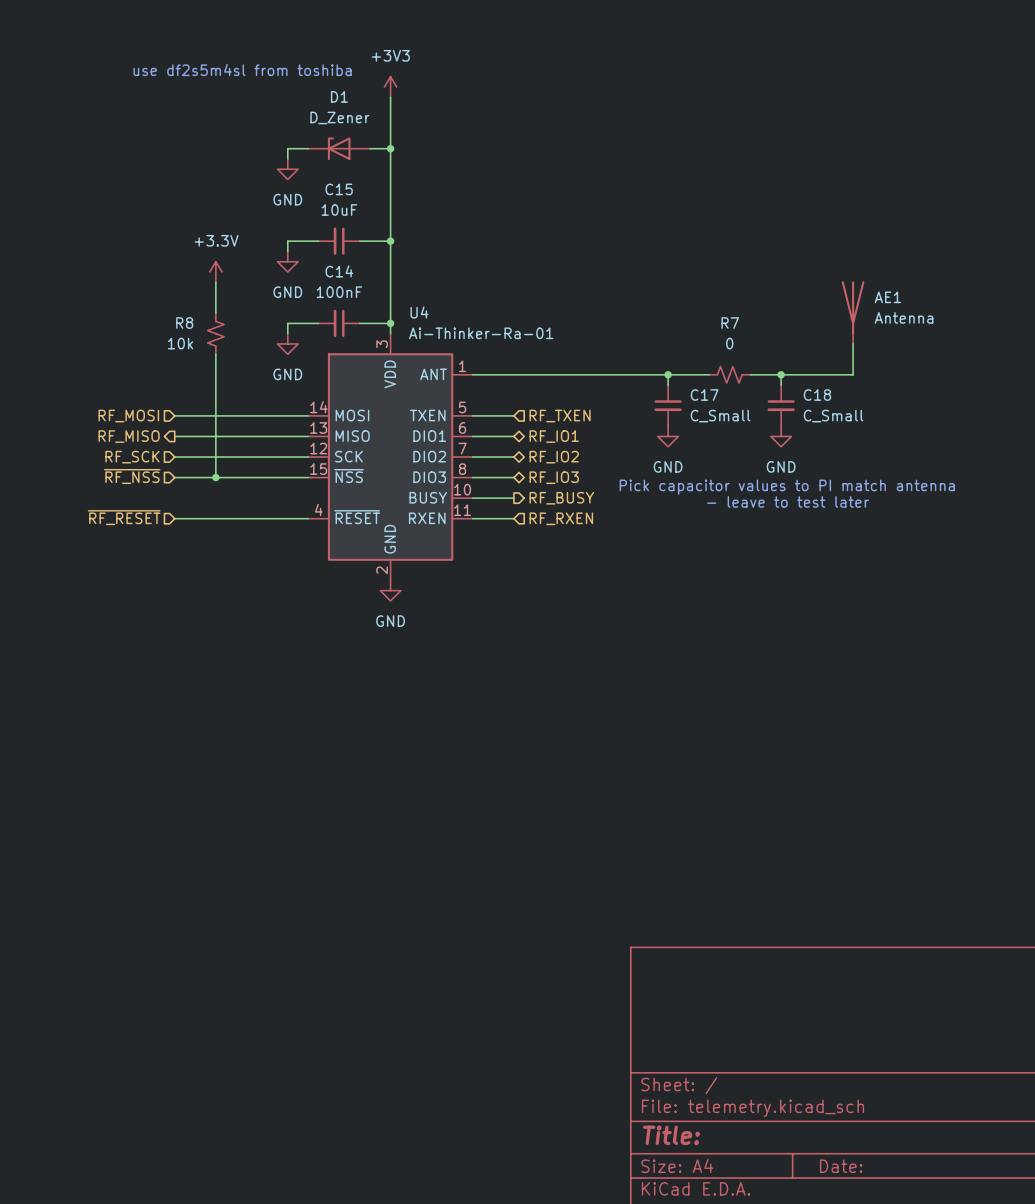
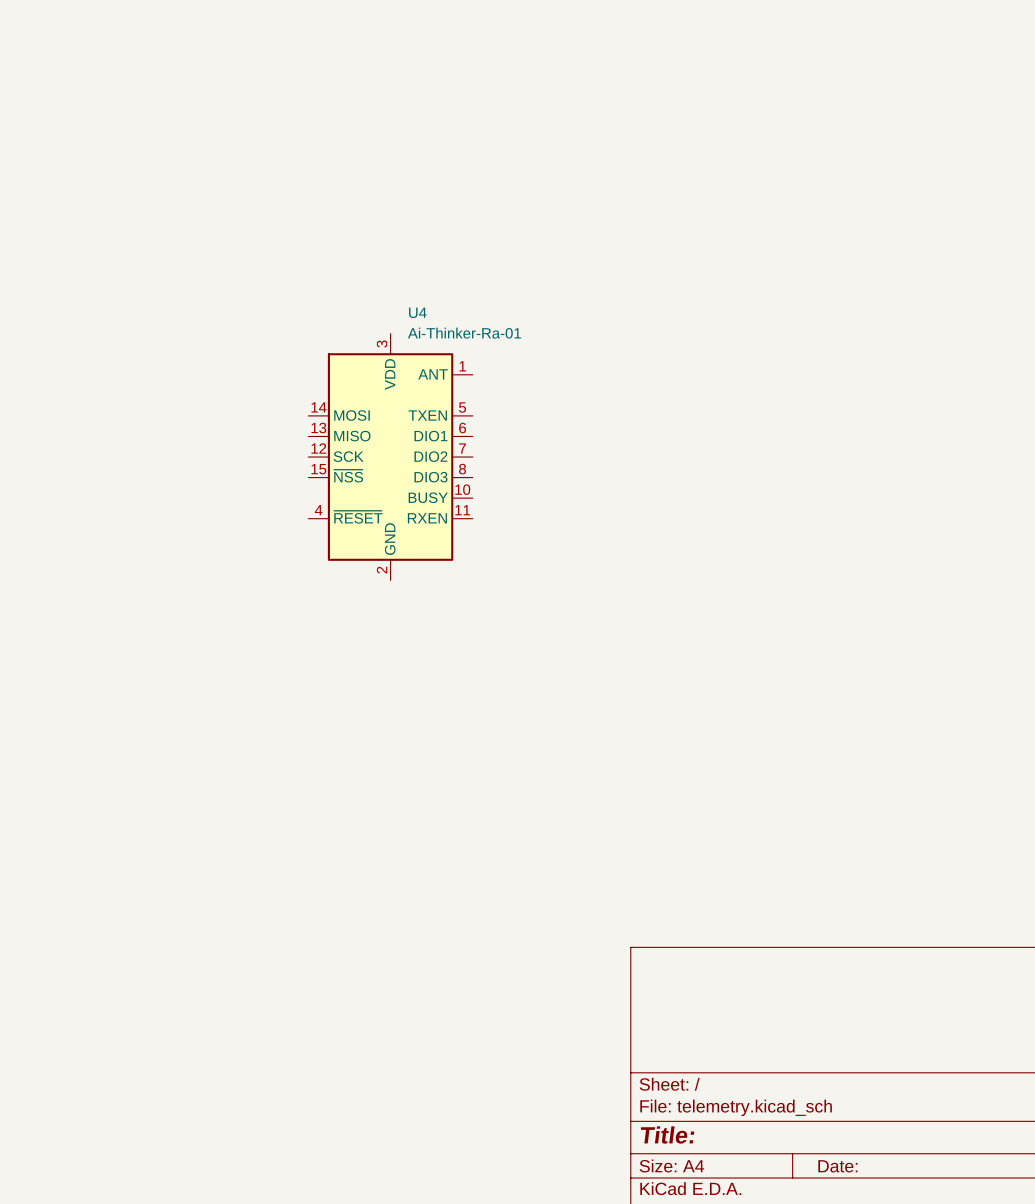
text: use df2s5m4sl from toshiba (242, 69) -> none
power symbol: +3V3 (390, 87) -> none
wire: (390, 97) (390, 333) -> none
wire: (308, 148) (287, 148) (287, 158) -> none
D1: D_Zener (339, 148) -> none
wire: (370, 148) (390, 148) -> none
junction: (390, 148) -> none
power symbol: GND (287, 169) -> none
wire: (318, 241) (287, 241) (287, 251) -> none
C15: 10uF (339, 241) -> none
wire: (359, 241) (390, 241) -> none
junction: (390, 241) -> none
power symbol: GND (287, 261) -> none
power symbol: +3.3V (215, 272) -> none
wire: (215, 282) (215, 313) -> none
AE1: Antenna (853, 312) -> none
wire: (318, 323) (287, 323) (287, 333) -> none
C14: 100nF (339, 323) -> none
wire: (359, 323) (390, 323) -> none
junction: (390, 323) -> none
R8: 10k (215, 333) -> none
power symbol: GND (287, 343) -> none
wire: (853, 343) (853, 374) (750, 374) -> none
wire: (215, 354) (215, 477) -> none
wire: (472, 374) (709, 374) -> none
wire: (668, 374) (668, 385) -> none
junction: (668, 374) -> none
R7: 0 (729, 374) -> none
wire: (781, 374) (781, 385) -> none
junction: (781, 374) -> none
C17: C_Small (668, 405) -> none
C18: C_Small (781, 405) -> none
wire: (174, 415) (308, 415) -> none
wire: (472, 415) (513, 415) -> none
hierarchical label: RF_MOSI (128, 416) -> none
hierarchical label: RF_TXEN (560, 416) -> none
hierarchical label: RF_MISO (129, 436) -> none
wire: (174, 436) (308, 436) -> none
wire: (472, 436) (513, 436) -> none
hierarchical label: RF_IO1 (554, 436) -> none
power symbol: GND (668, 436) -> none
power symbol: GND (781, 436) -> none
hierarchical label: RF_SCK (132, 457) -> none
wire: (174, 457) (308, 457) -> none
wire: (472, 457) (513, 457) -> none
hierarchical label: RF_IO2 (554, 457) -> none
hierarchical label: ~{RF_NSS} (132, 476) -> none
wire: (174, 477) (308, 477) -> none
junction: (215, 477) -> none
wire: (472, 477) (513, 477) -> none
hierarchical label: RF_IO3 (554, 477) -> none
text: Pick capacitor values to PI match antenna (787, 487) -> none
wire: (472, 498) (513, 498) -> none
hierarchical label: RF_BUSY (561, 498) -> none
text: - leave to test later (788, 501) -> none
hierarchical label: ~{RF_RESET} (124, 517) -> none
wire: (174, 518) (308, 518) -> none
wire: (472, 518) (513, 518) -> none
hierarchical label: RF_RXEN (561, 518) -> none
power symbol: GND (390, 590) -> none

